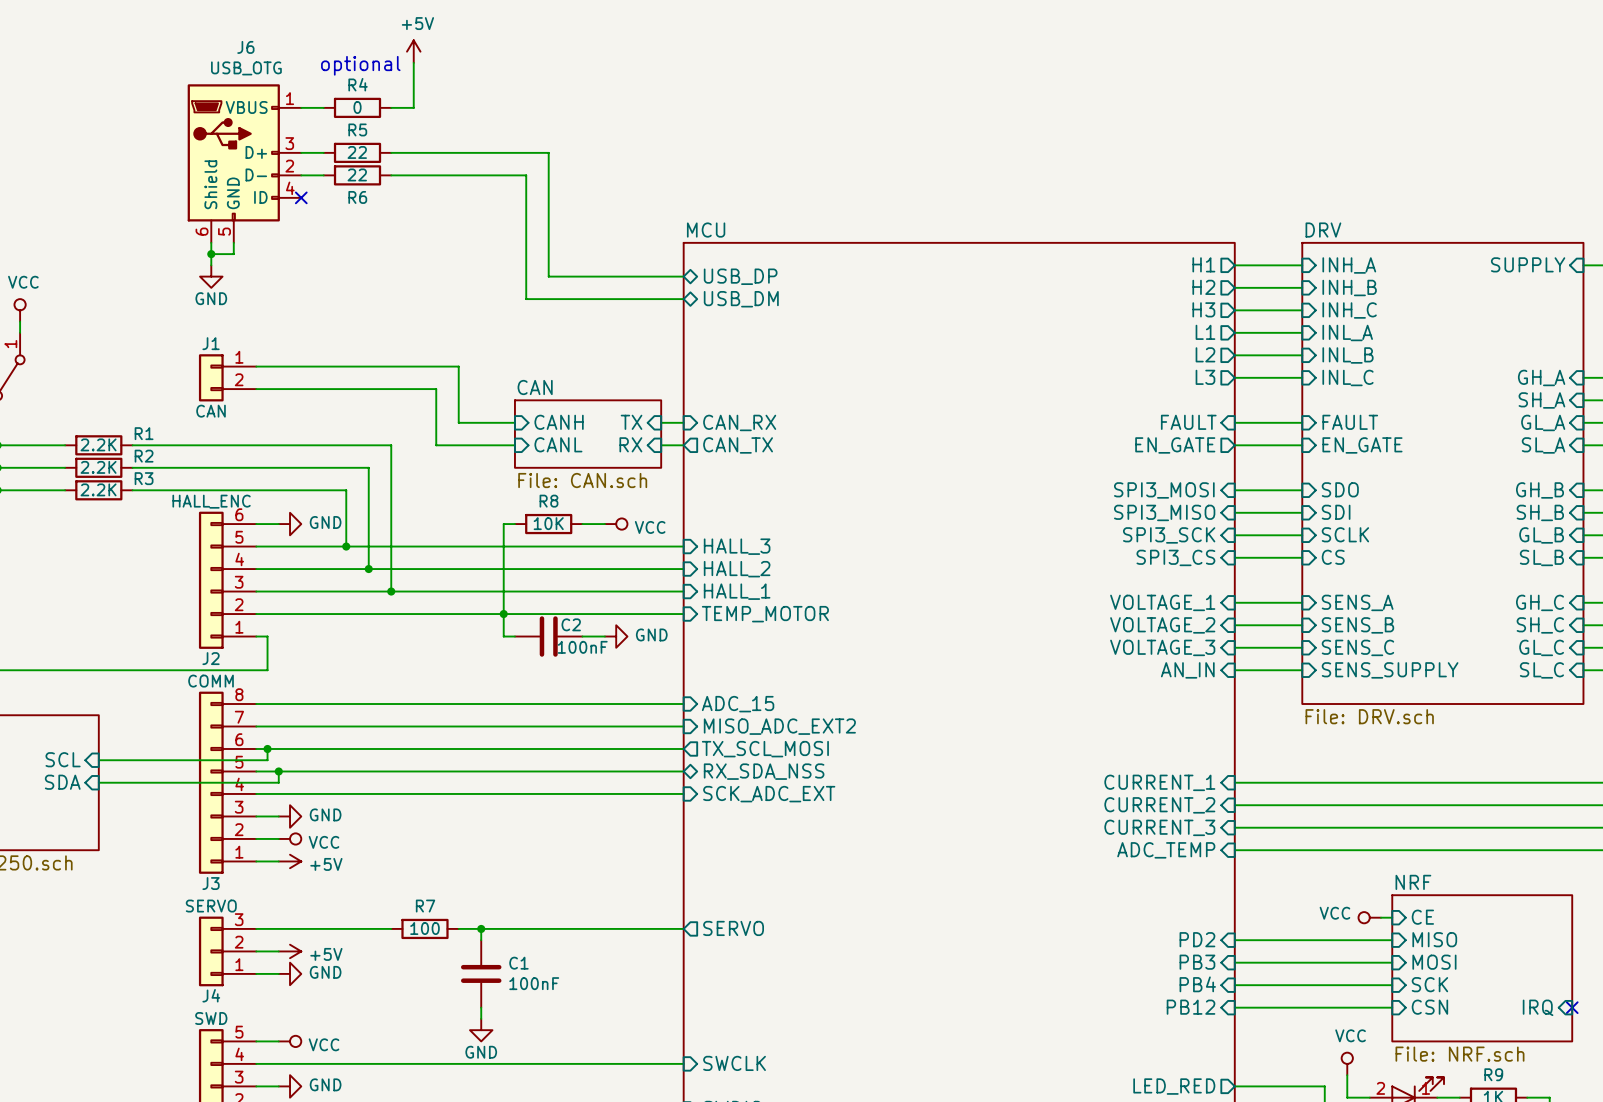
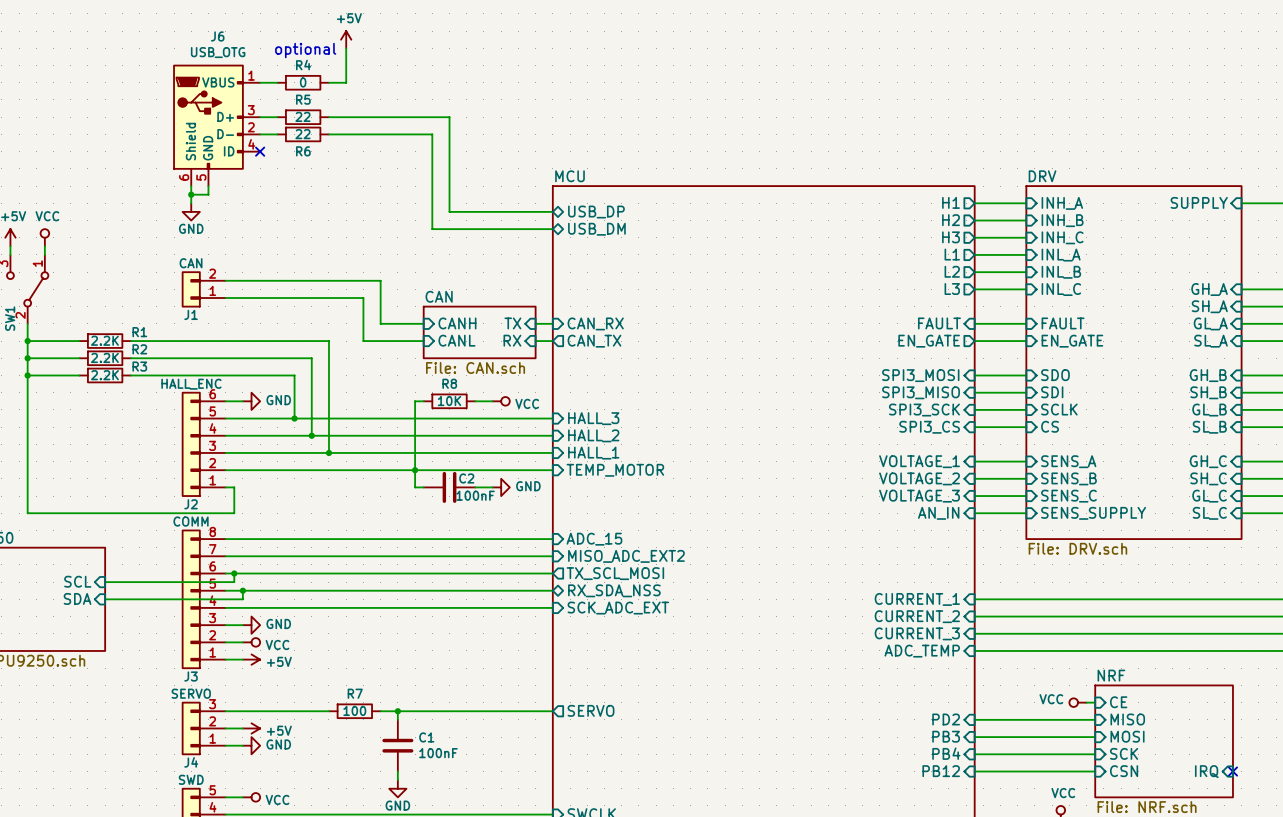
J1 flip: as is (211, 377) -> up-down (191, 289)

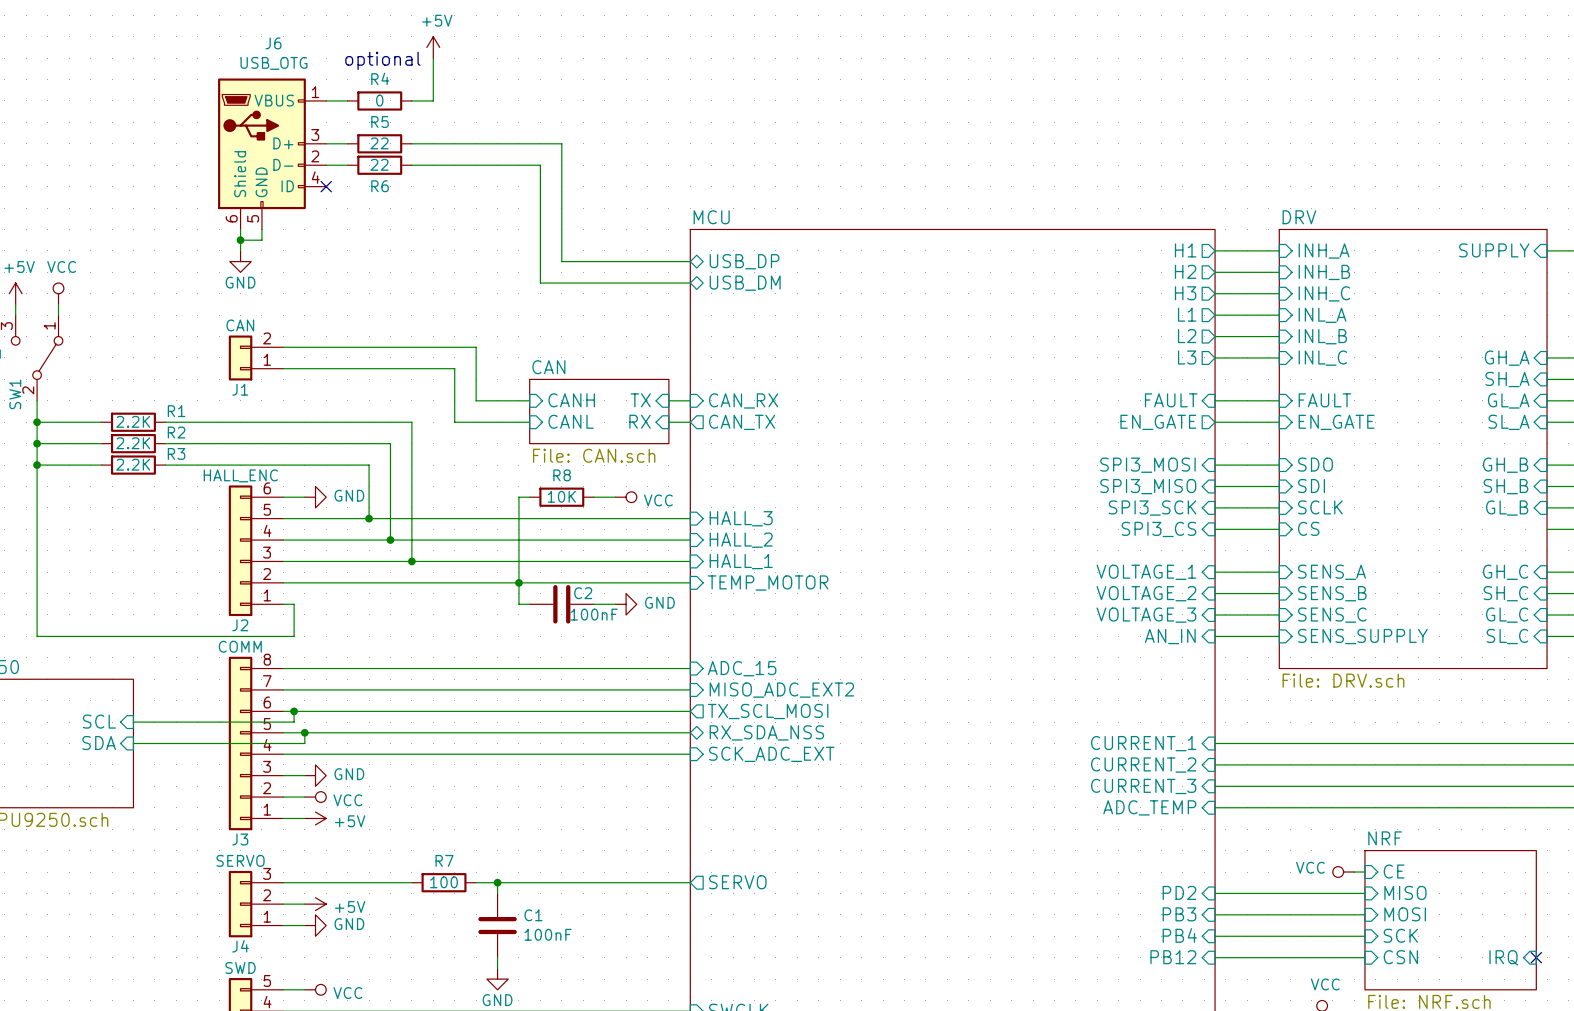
sheet pin: SL_B (1209, 427) -> none

